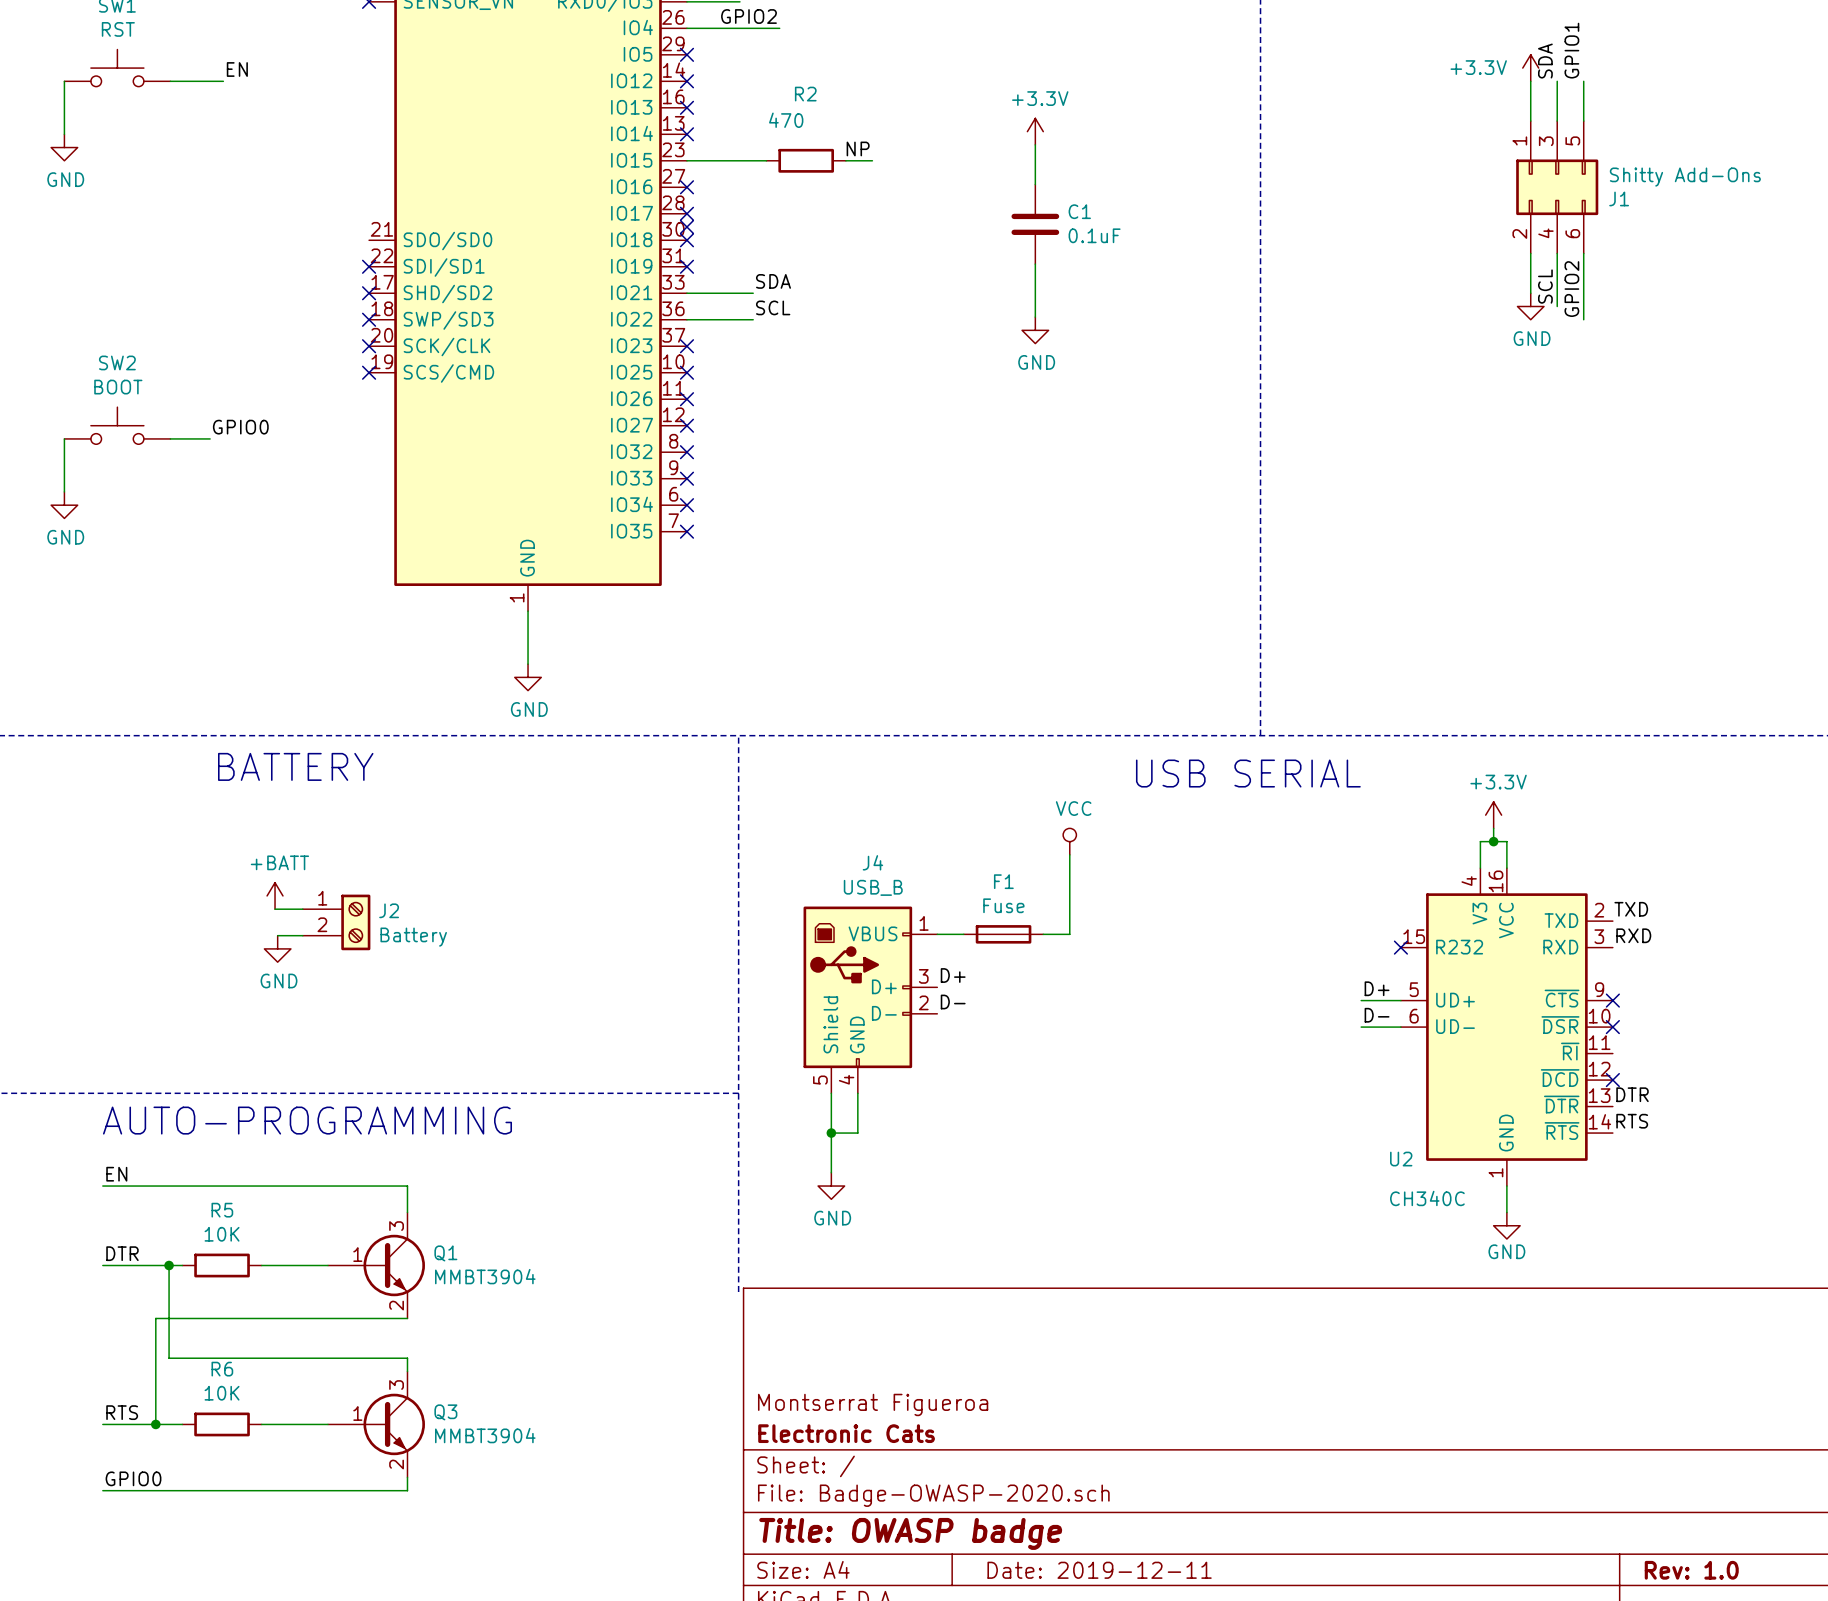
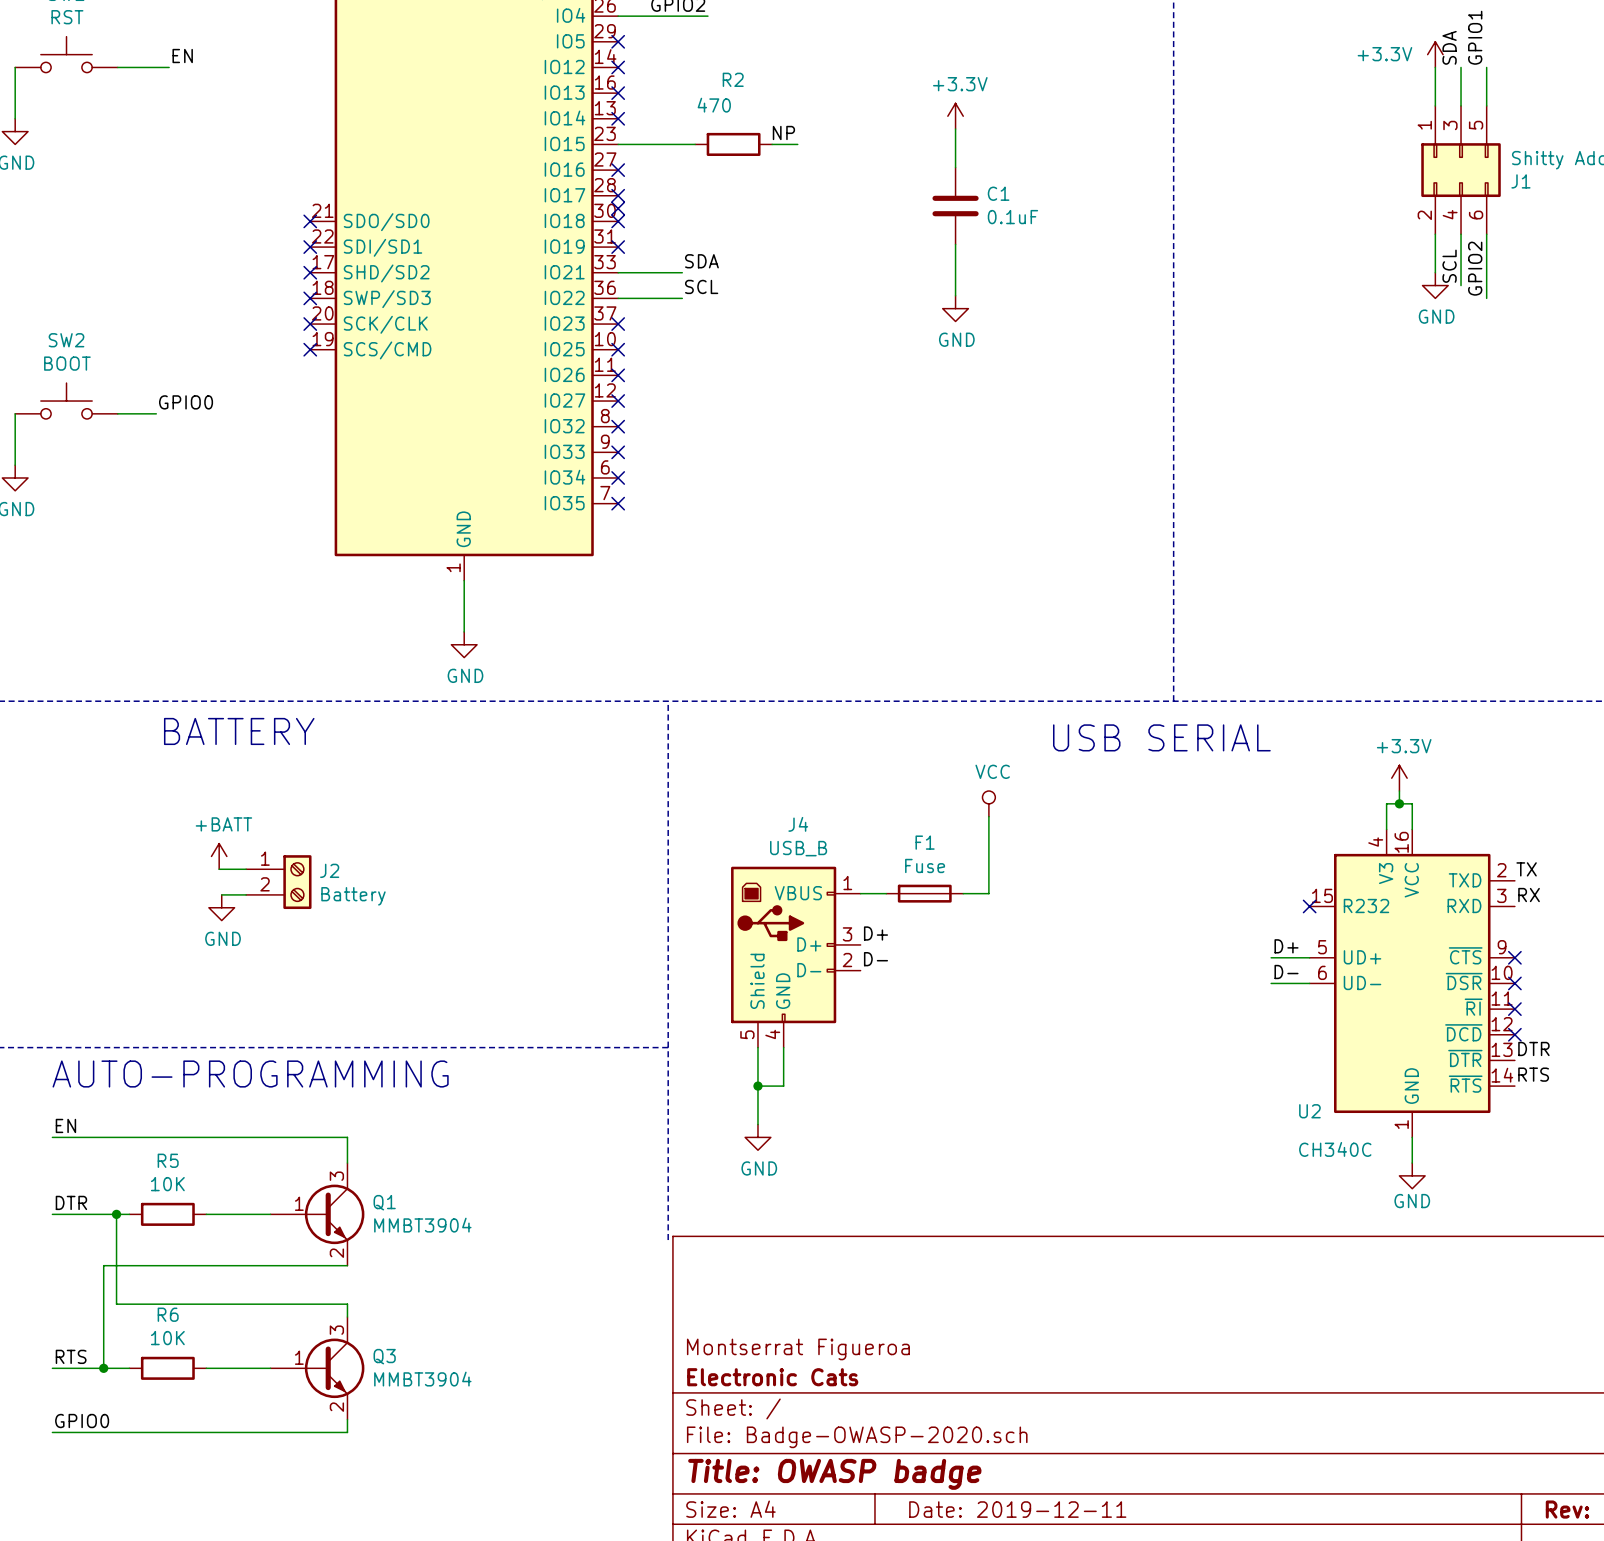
no-connect mark: none -> (310, 221)
label: TXD (1631, 909) -> TX (1526, 869)
label: RXD (1633, 935) -> RX (1529, 895)
no-connect mark: none -> (1514, 1009)

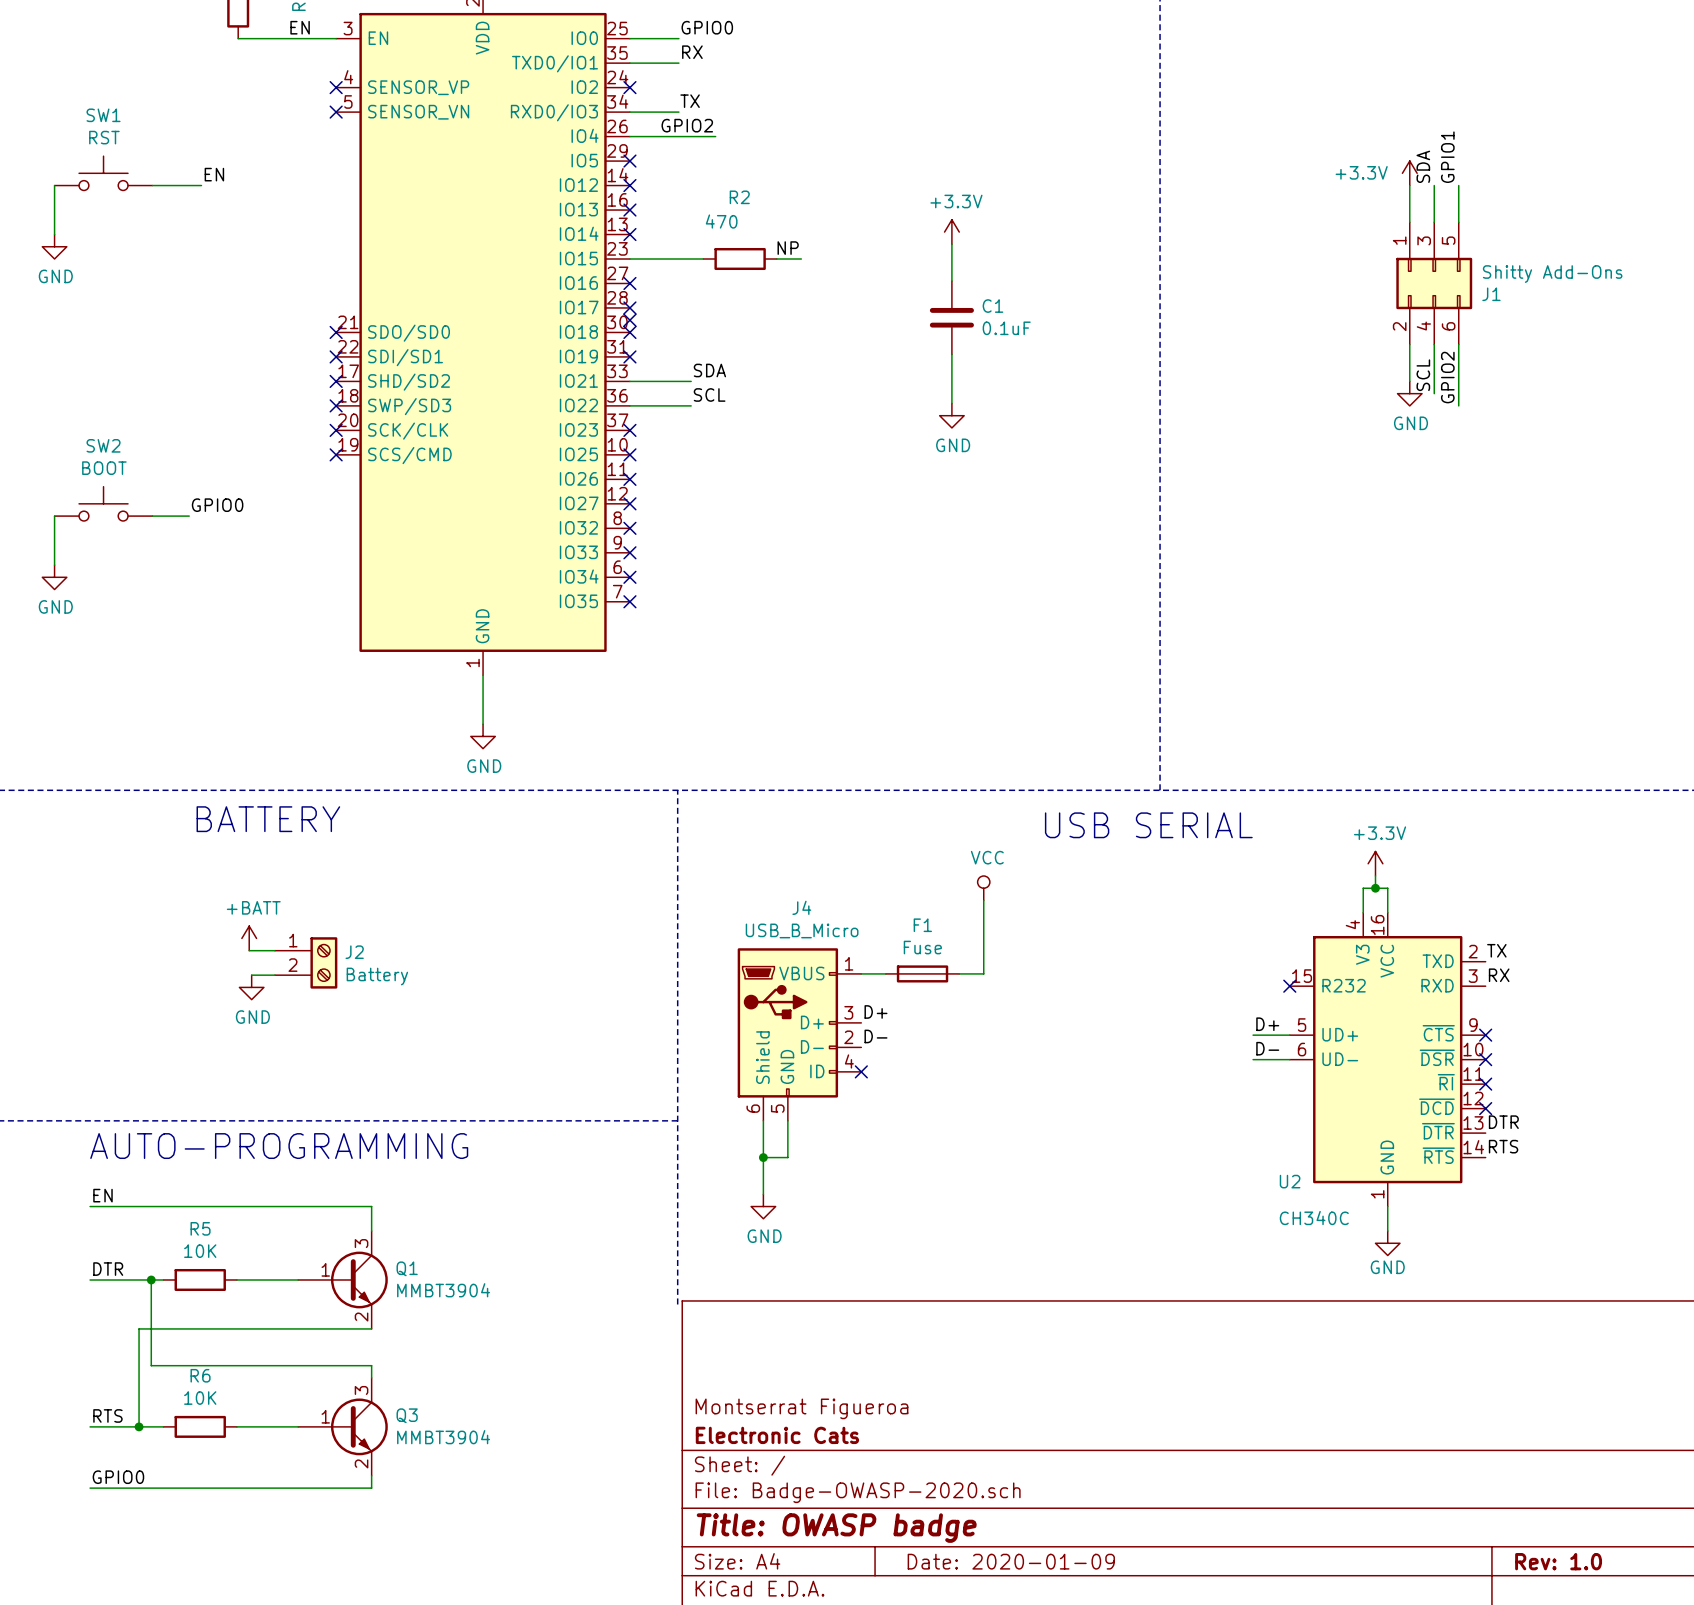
J4 value: USB_B (798, 848) -> USB_B_Micro (802, 930)
J4 symbol: [731, 866, 861, 1048] -> [737, 948, 862, 1121]
no-connect mark: none -> (861, 1071)
title block: Date: 2019-12-11 (1017, 1509) -> Date: 2020-01-09 (1011, 1561)

